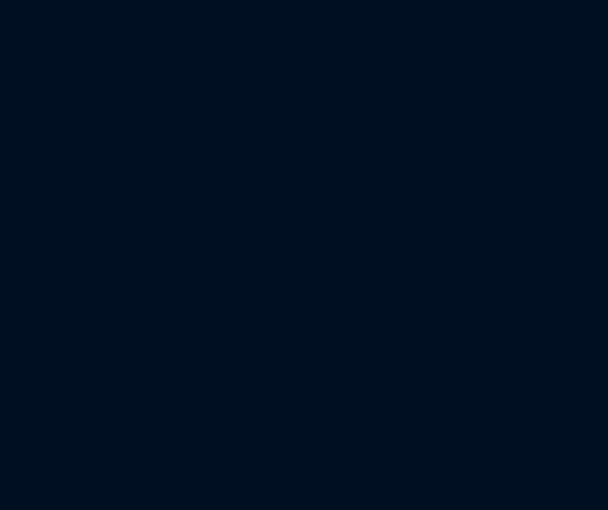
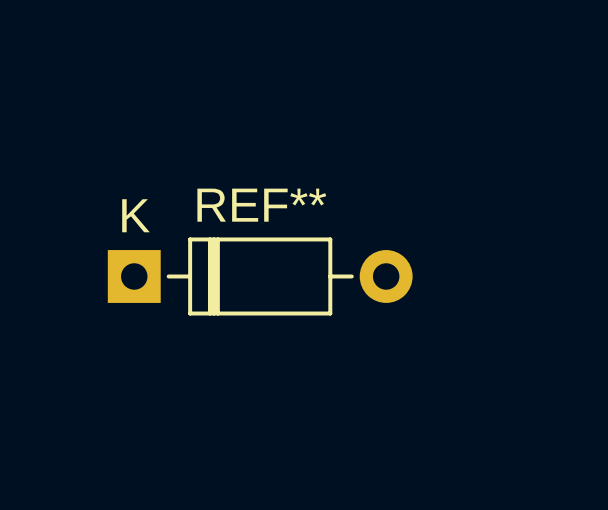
REF**: none -> (260, 276)

